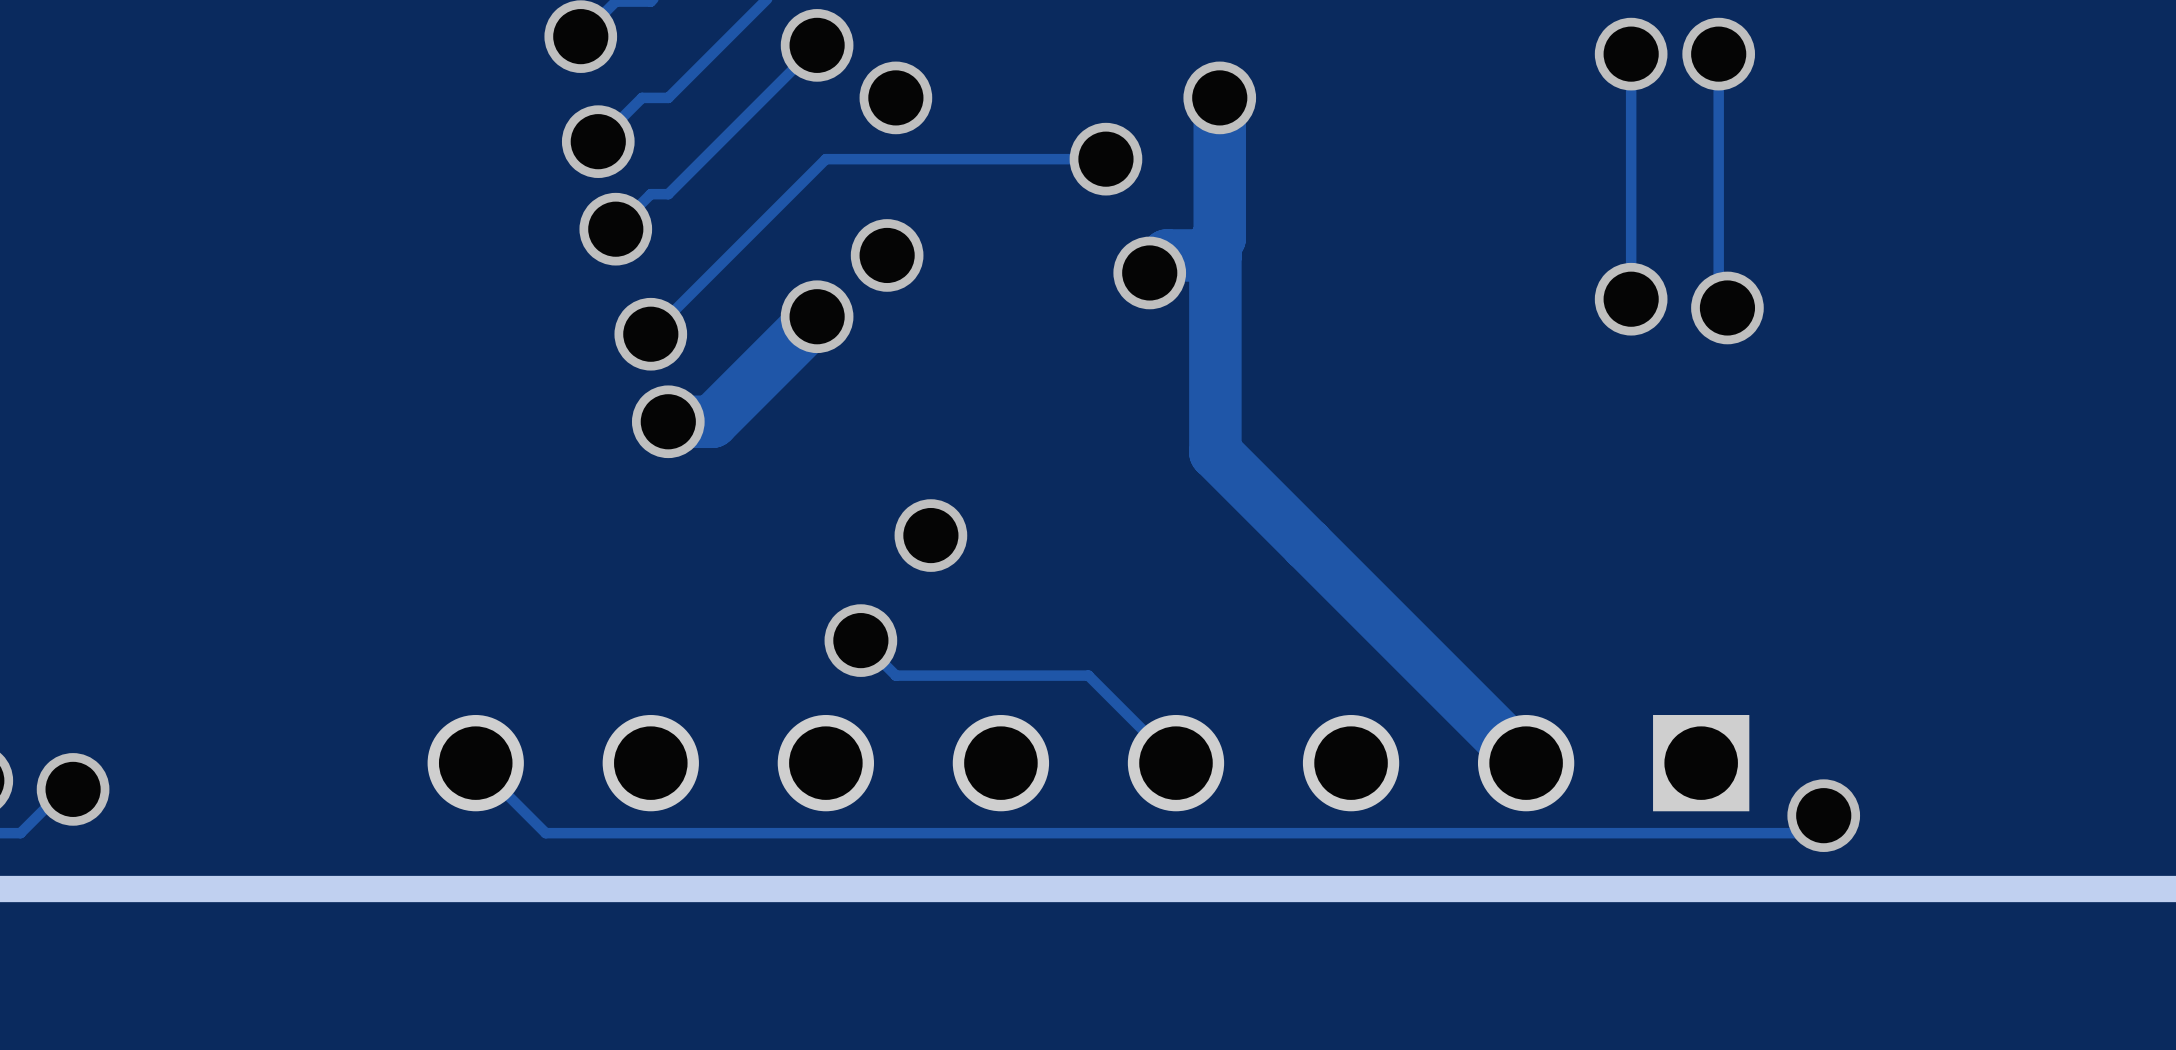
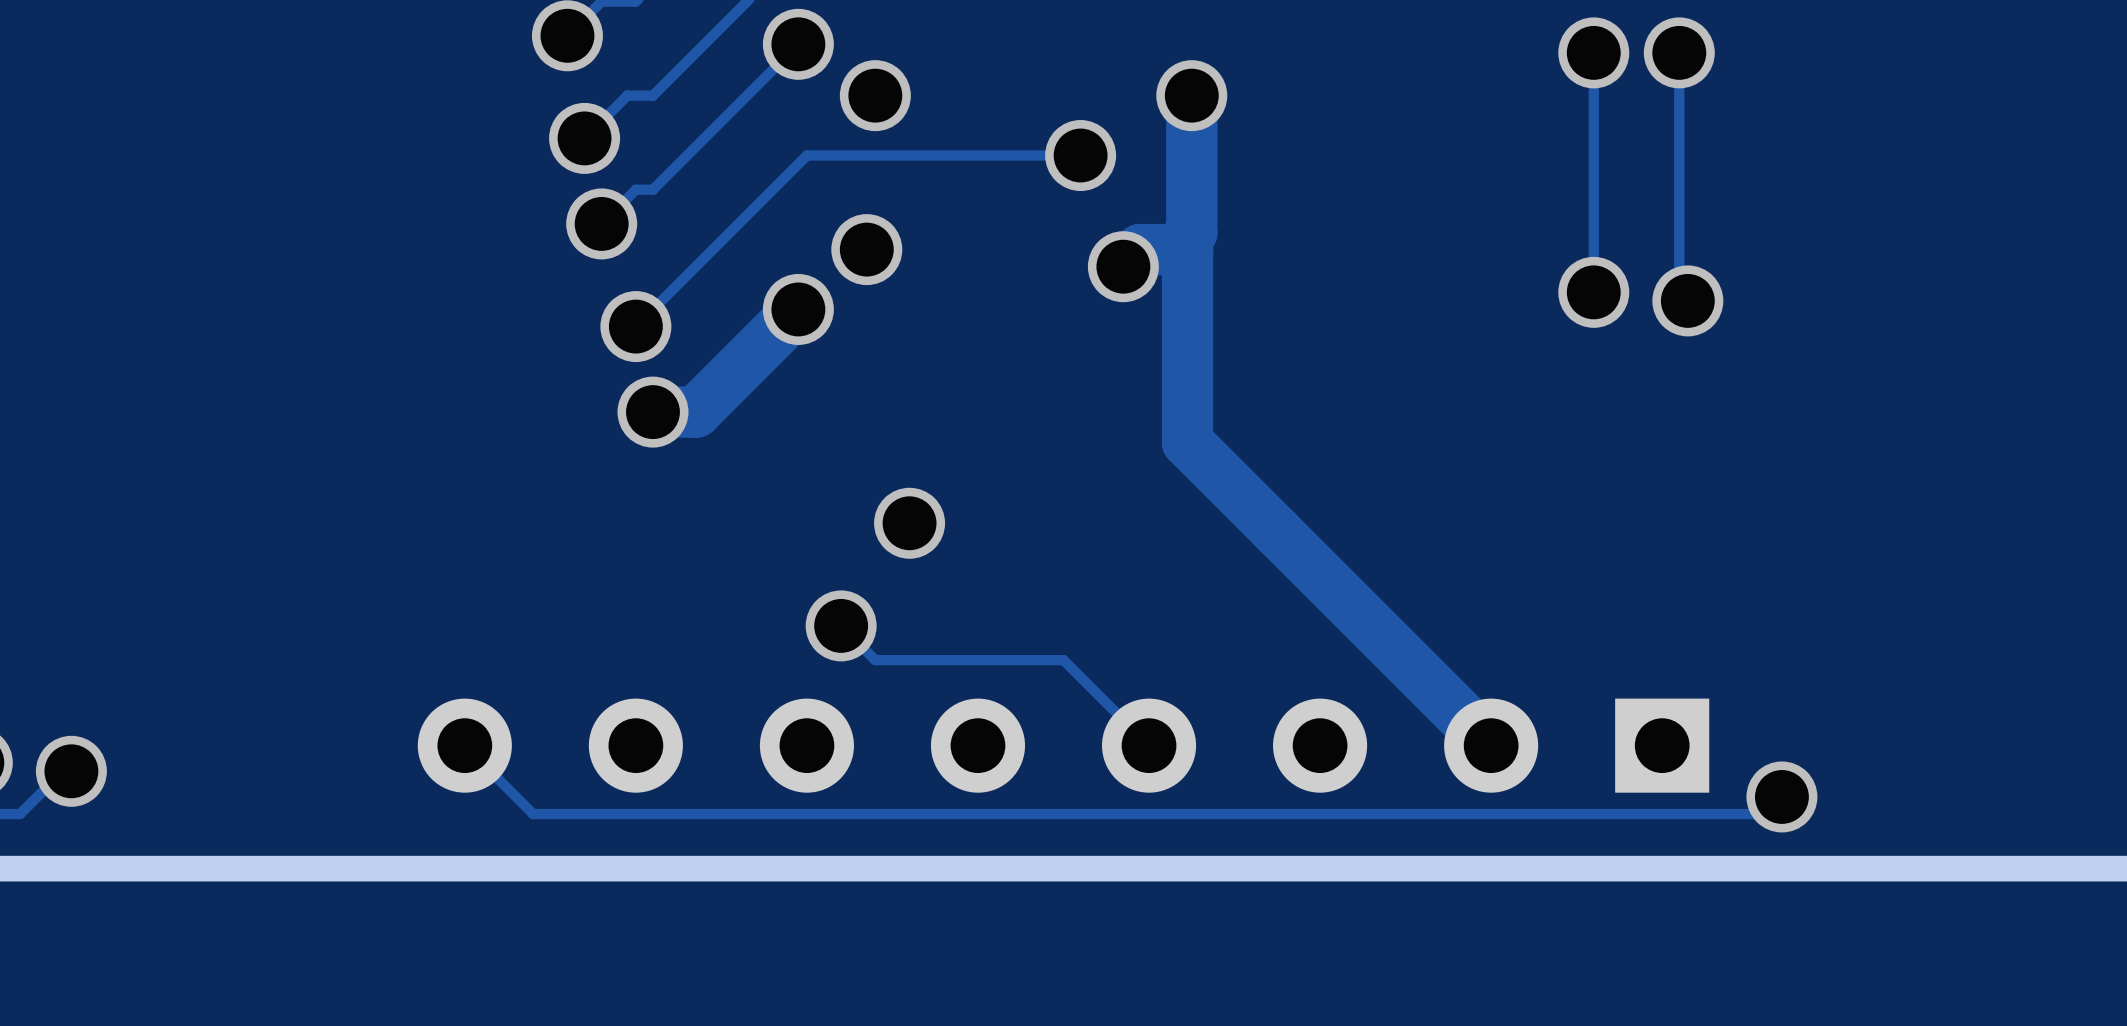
part footprint: [427, 714, 1750, 812] -> [417, 698, 1710, 793]

